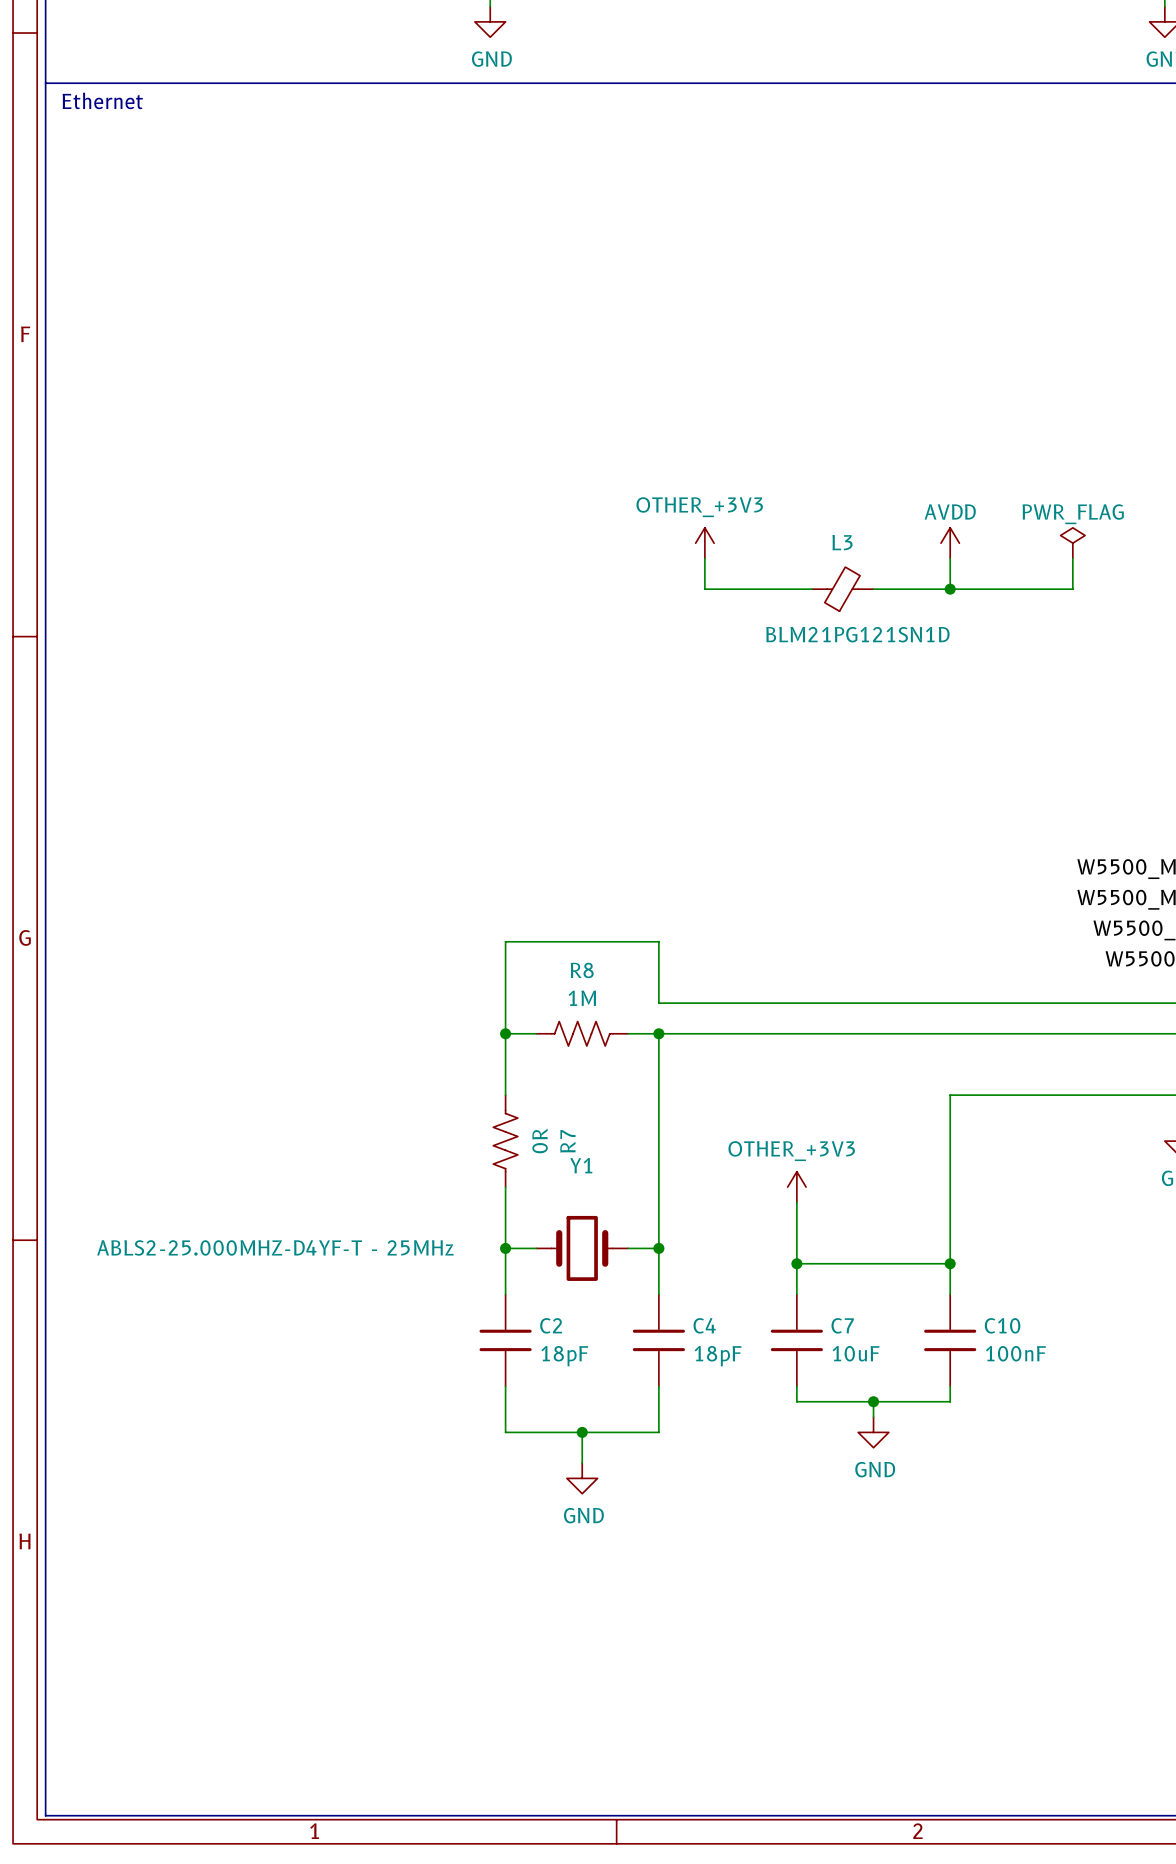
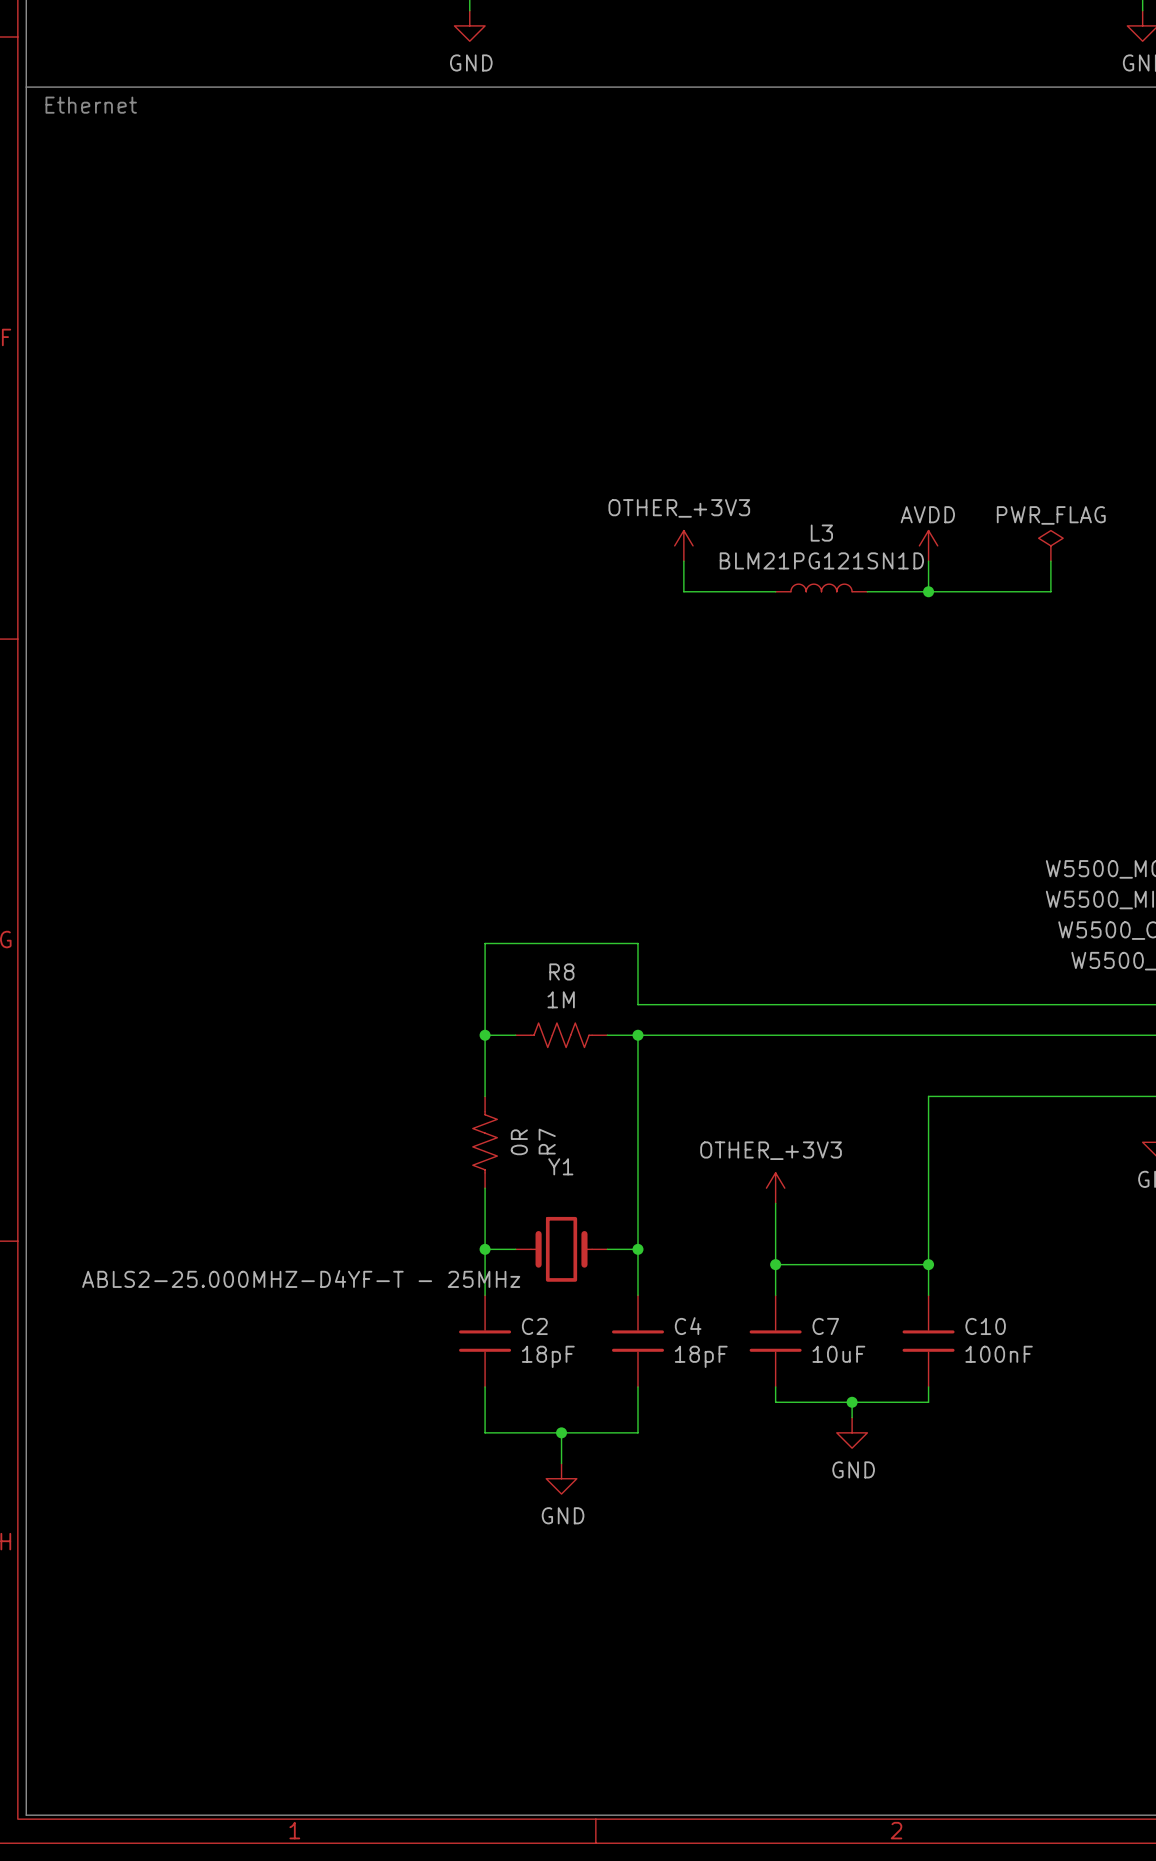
L3 symbol: [812, 567, 874, 612] -> [775, 584, 868, 592]
L3 value position: BLM21PG121SN1D (857, 634) -> BLM21PG121SN1D (821, 560)
Y1 value position: ABLS2-25.000MHZ-D4YF-T - 25MHz (275, 1247) -> ABLS2-25.000MHZ-D4YF-T - 25MHz (301, 1279)

